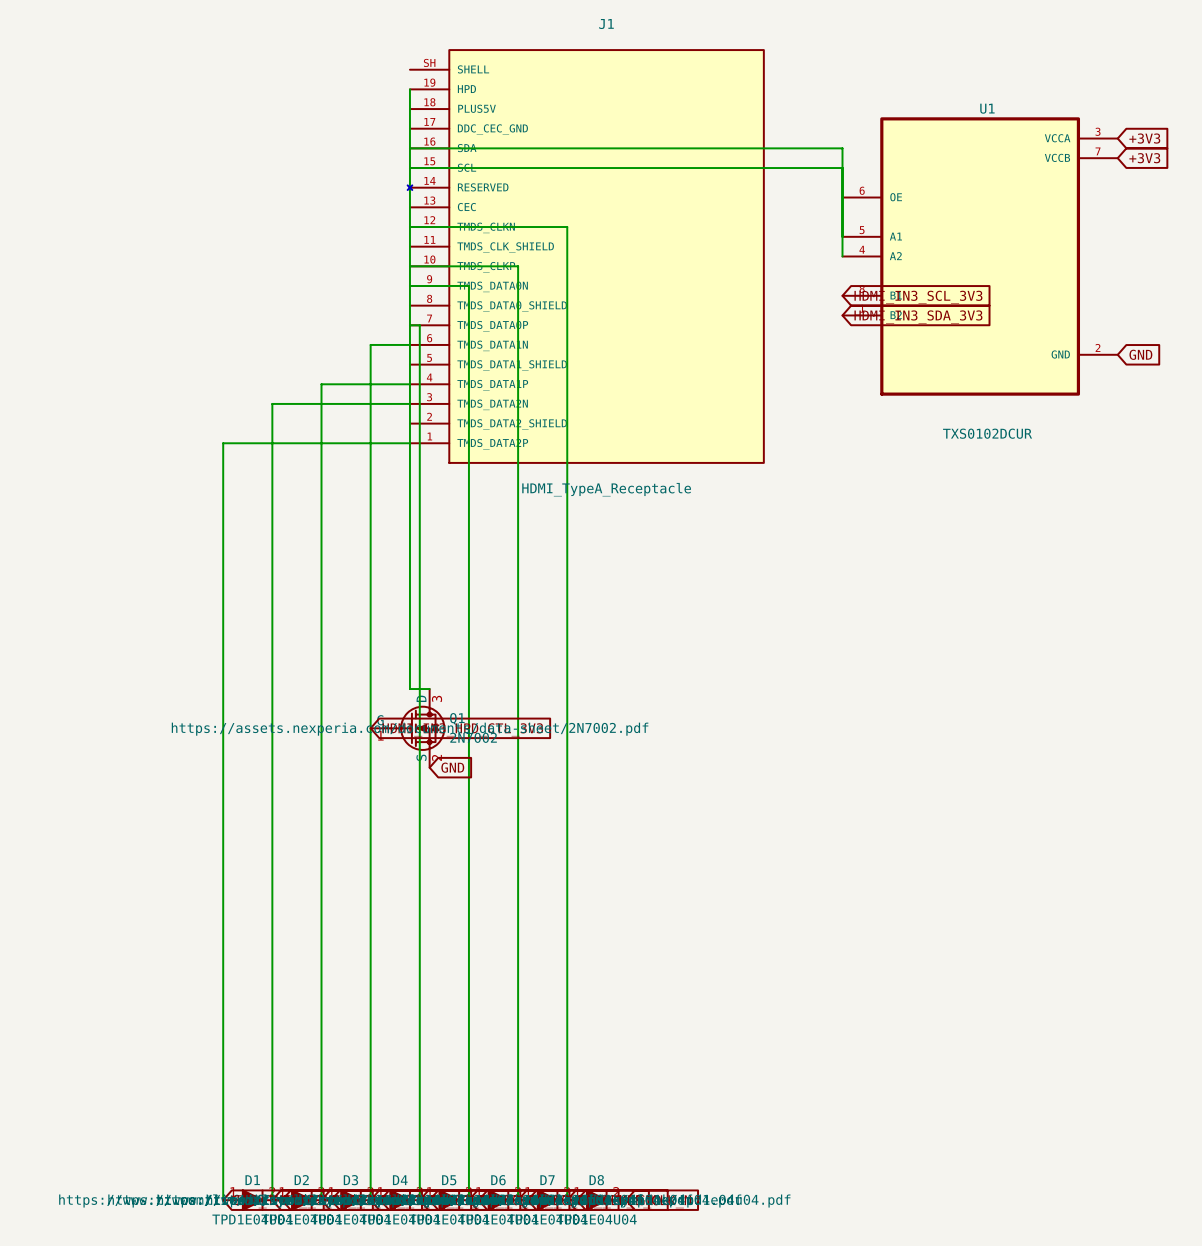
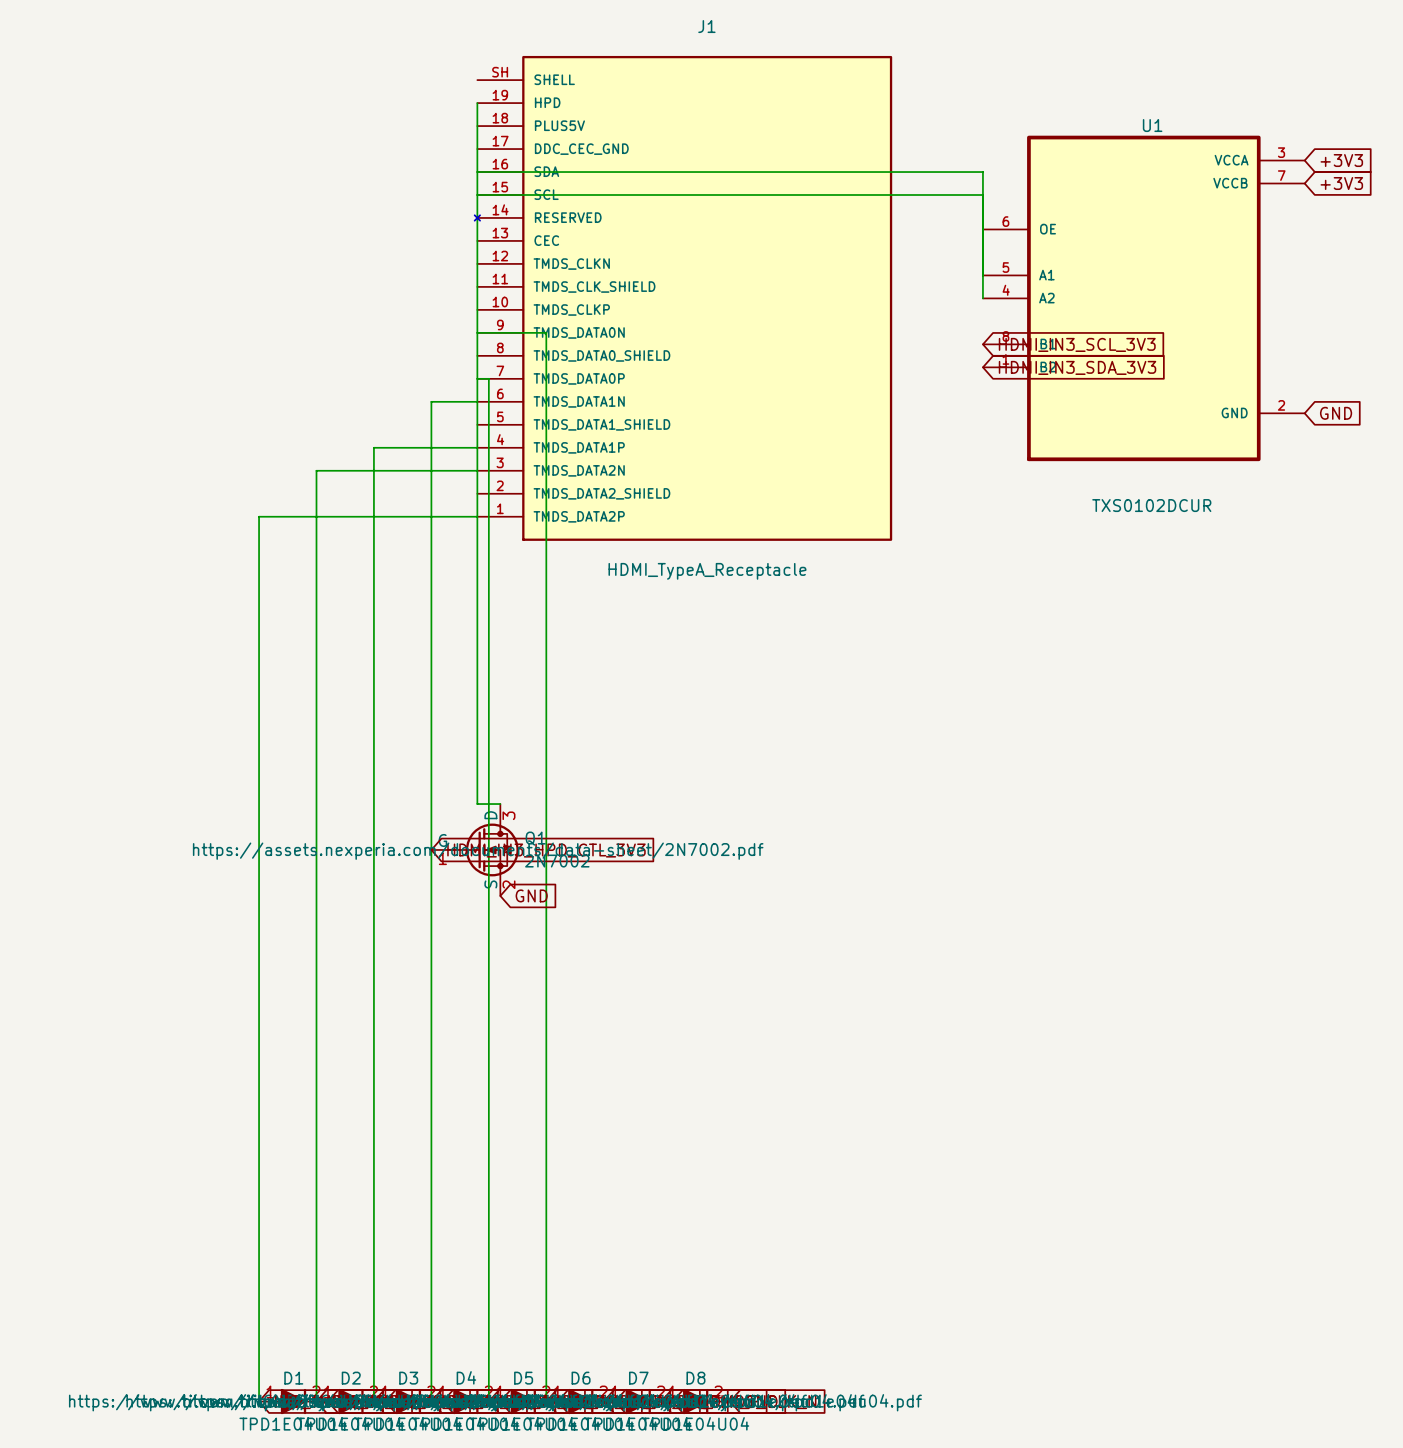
wire: (409, 227) (567, 227) (567, 1200) -> none
wire: (409, 266) (518, 266) (518, 1200) -> none

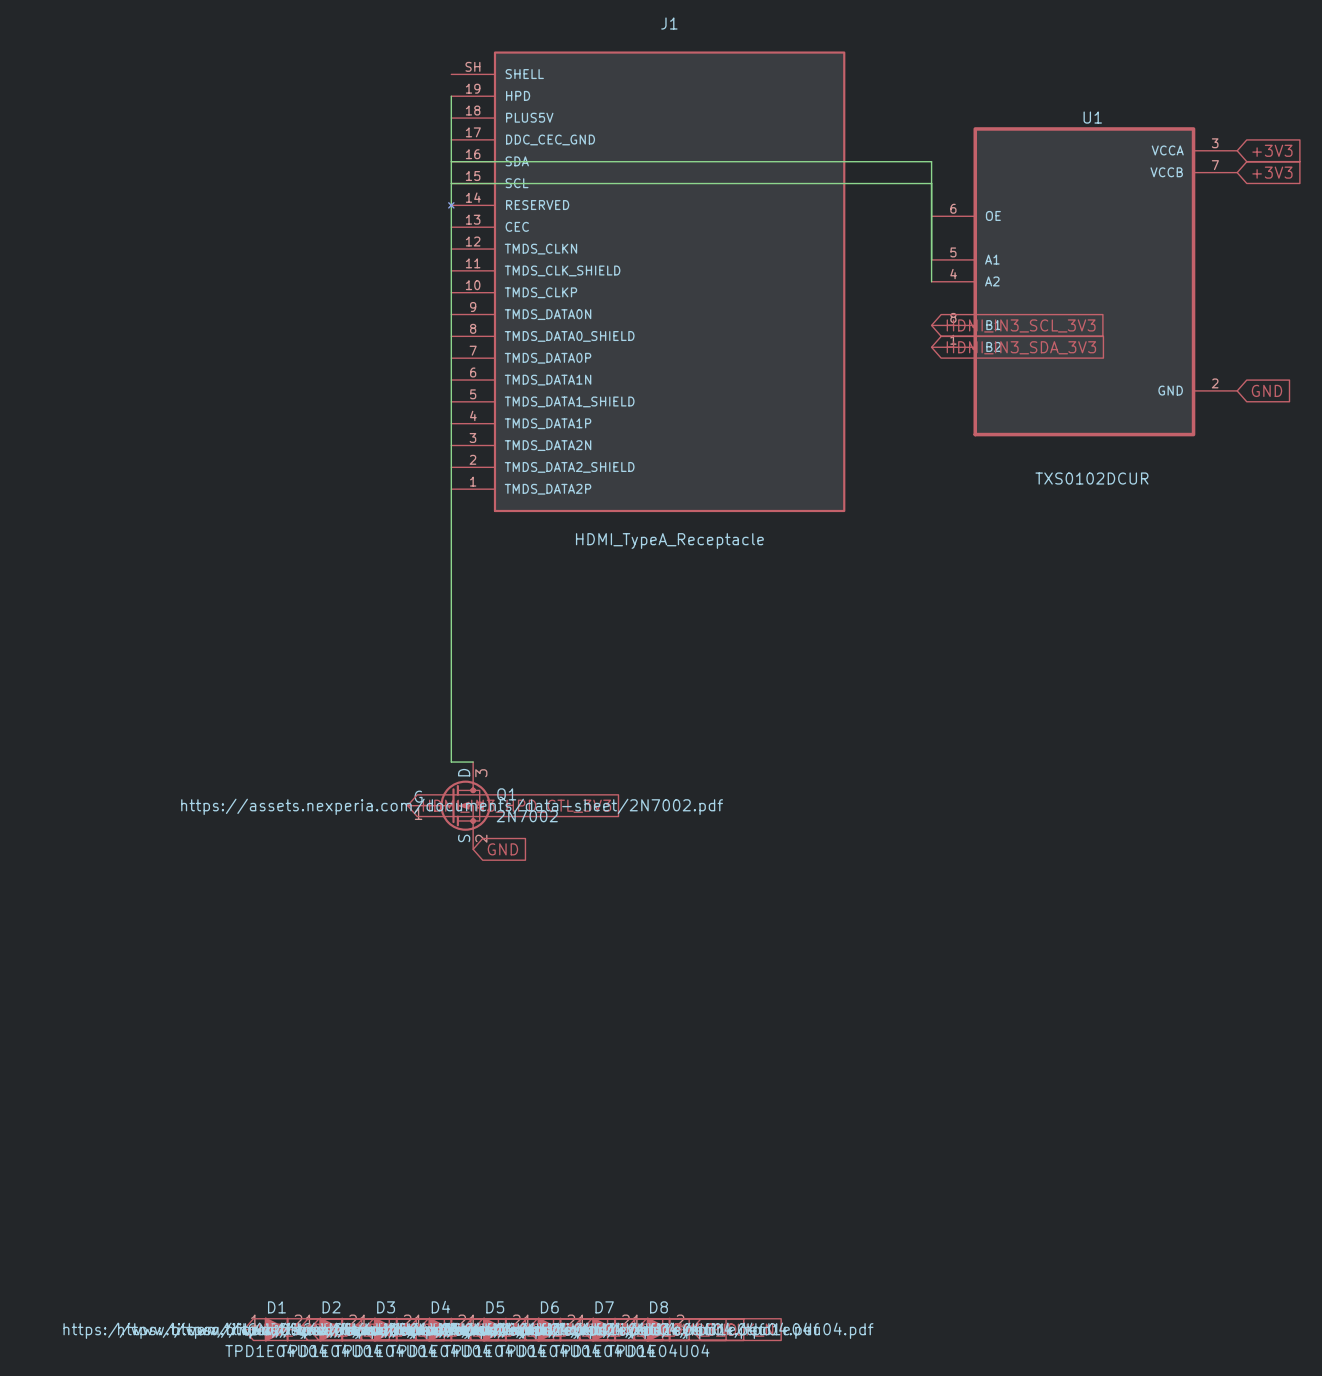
wire: (477, 332) (546, 332) (546, 1401) -> none
wire: (477, 378) (488, 378) (488, 1401) -> none
wire: (477, 401) (431, 401) (431, 1401) -> none
wire: (477, 447) (373, 447) (373, 1401) -> none
wire: (477, 470) (316, 470) (316, 1401) -> none
wire: (477, 516) (259, 516) (259, 1401) -> none

